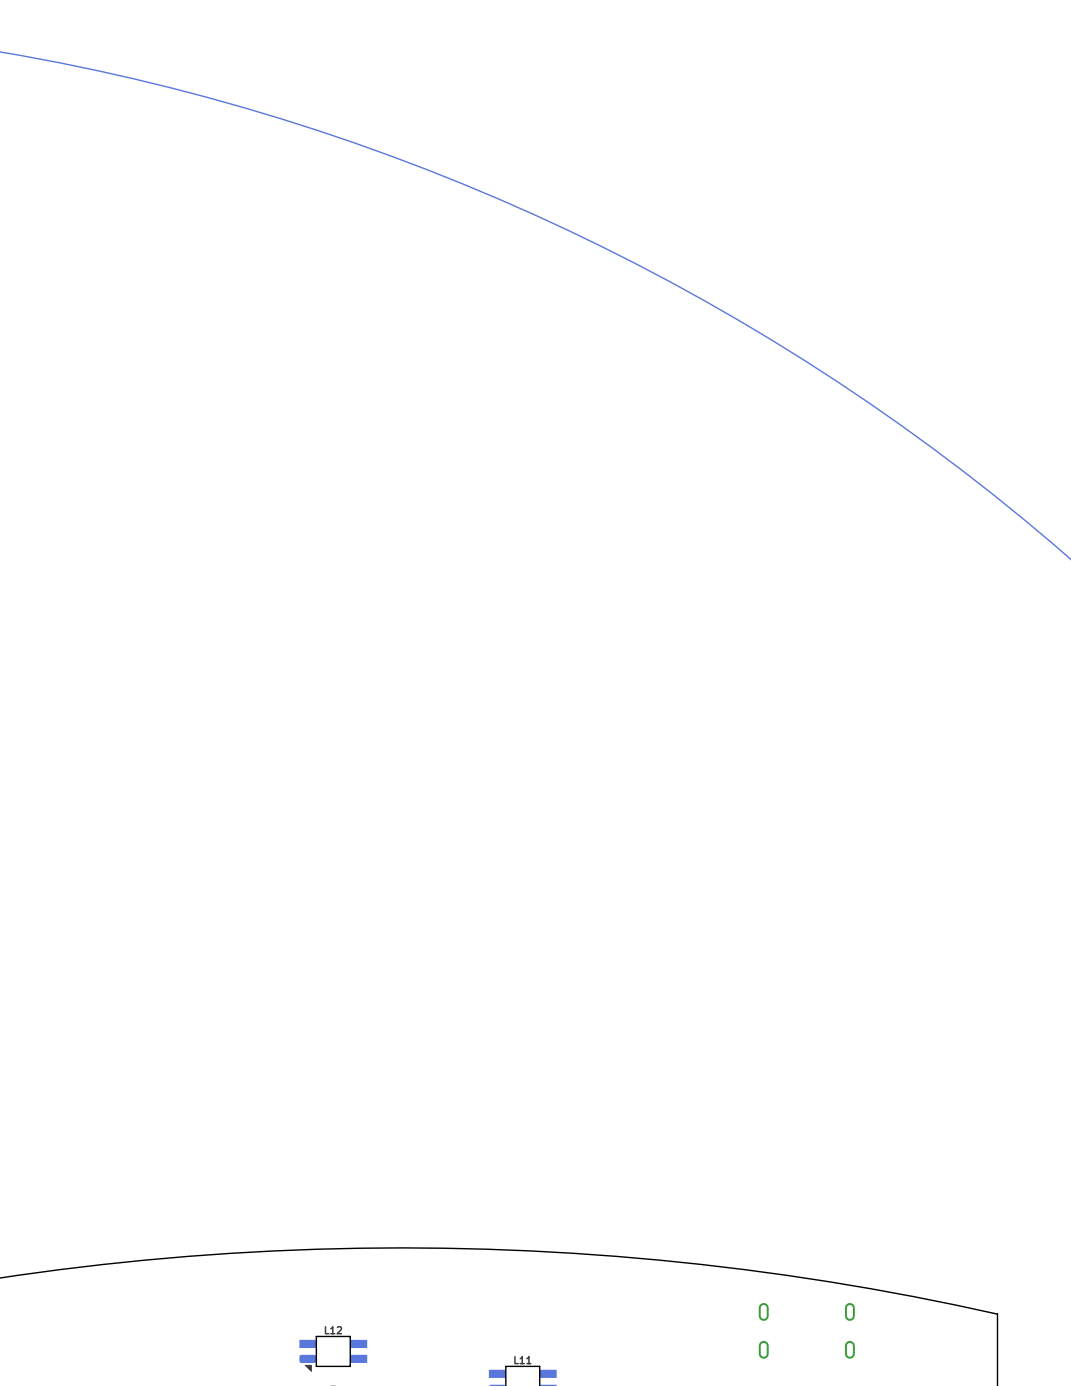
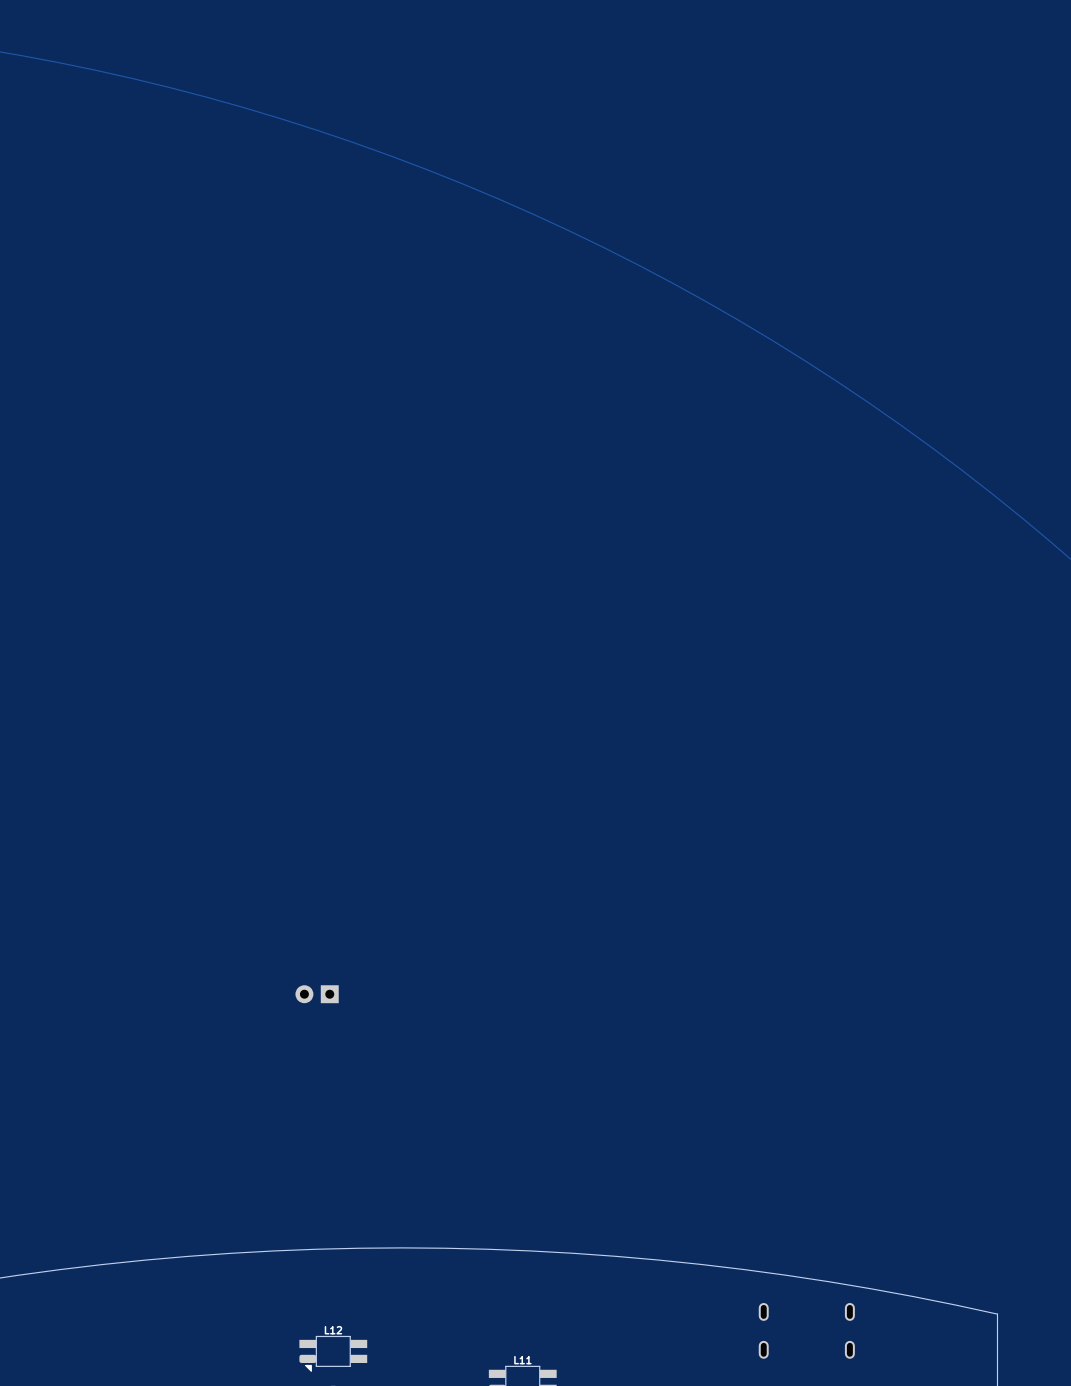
part: none -> (317, 994)

